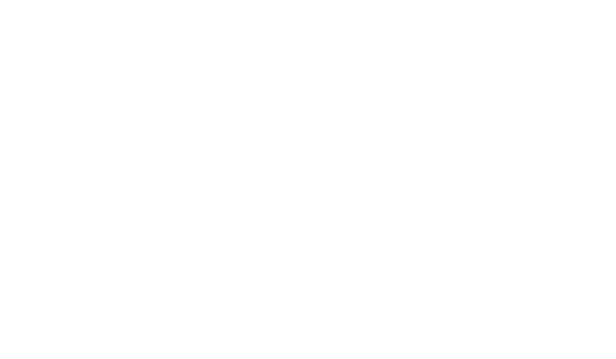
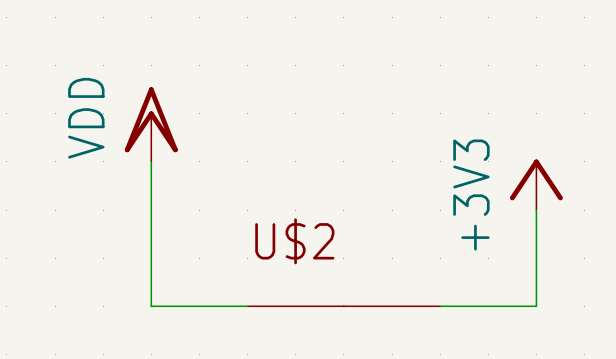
power symbol: none -> VDD (151, 124)
wire: none -> (151, 161) (151, 306) (247, 306)
power symbol: none -> +3V3 (536, 184)
wire: none -> (536, 210) (536, 306) (440, 306)
U$2: none -> (343, 306)

